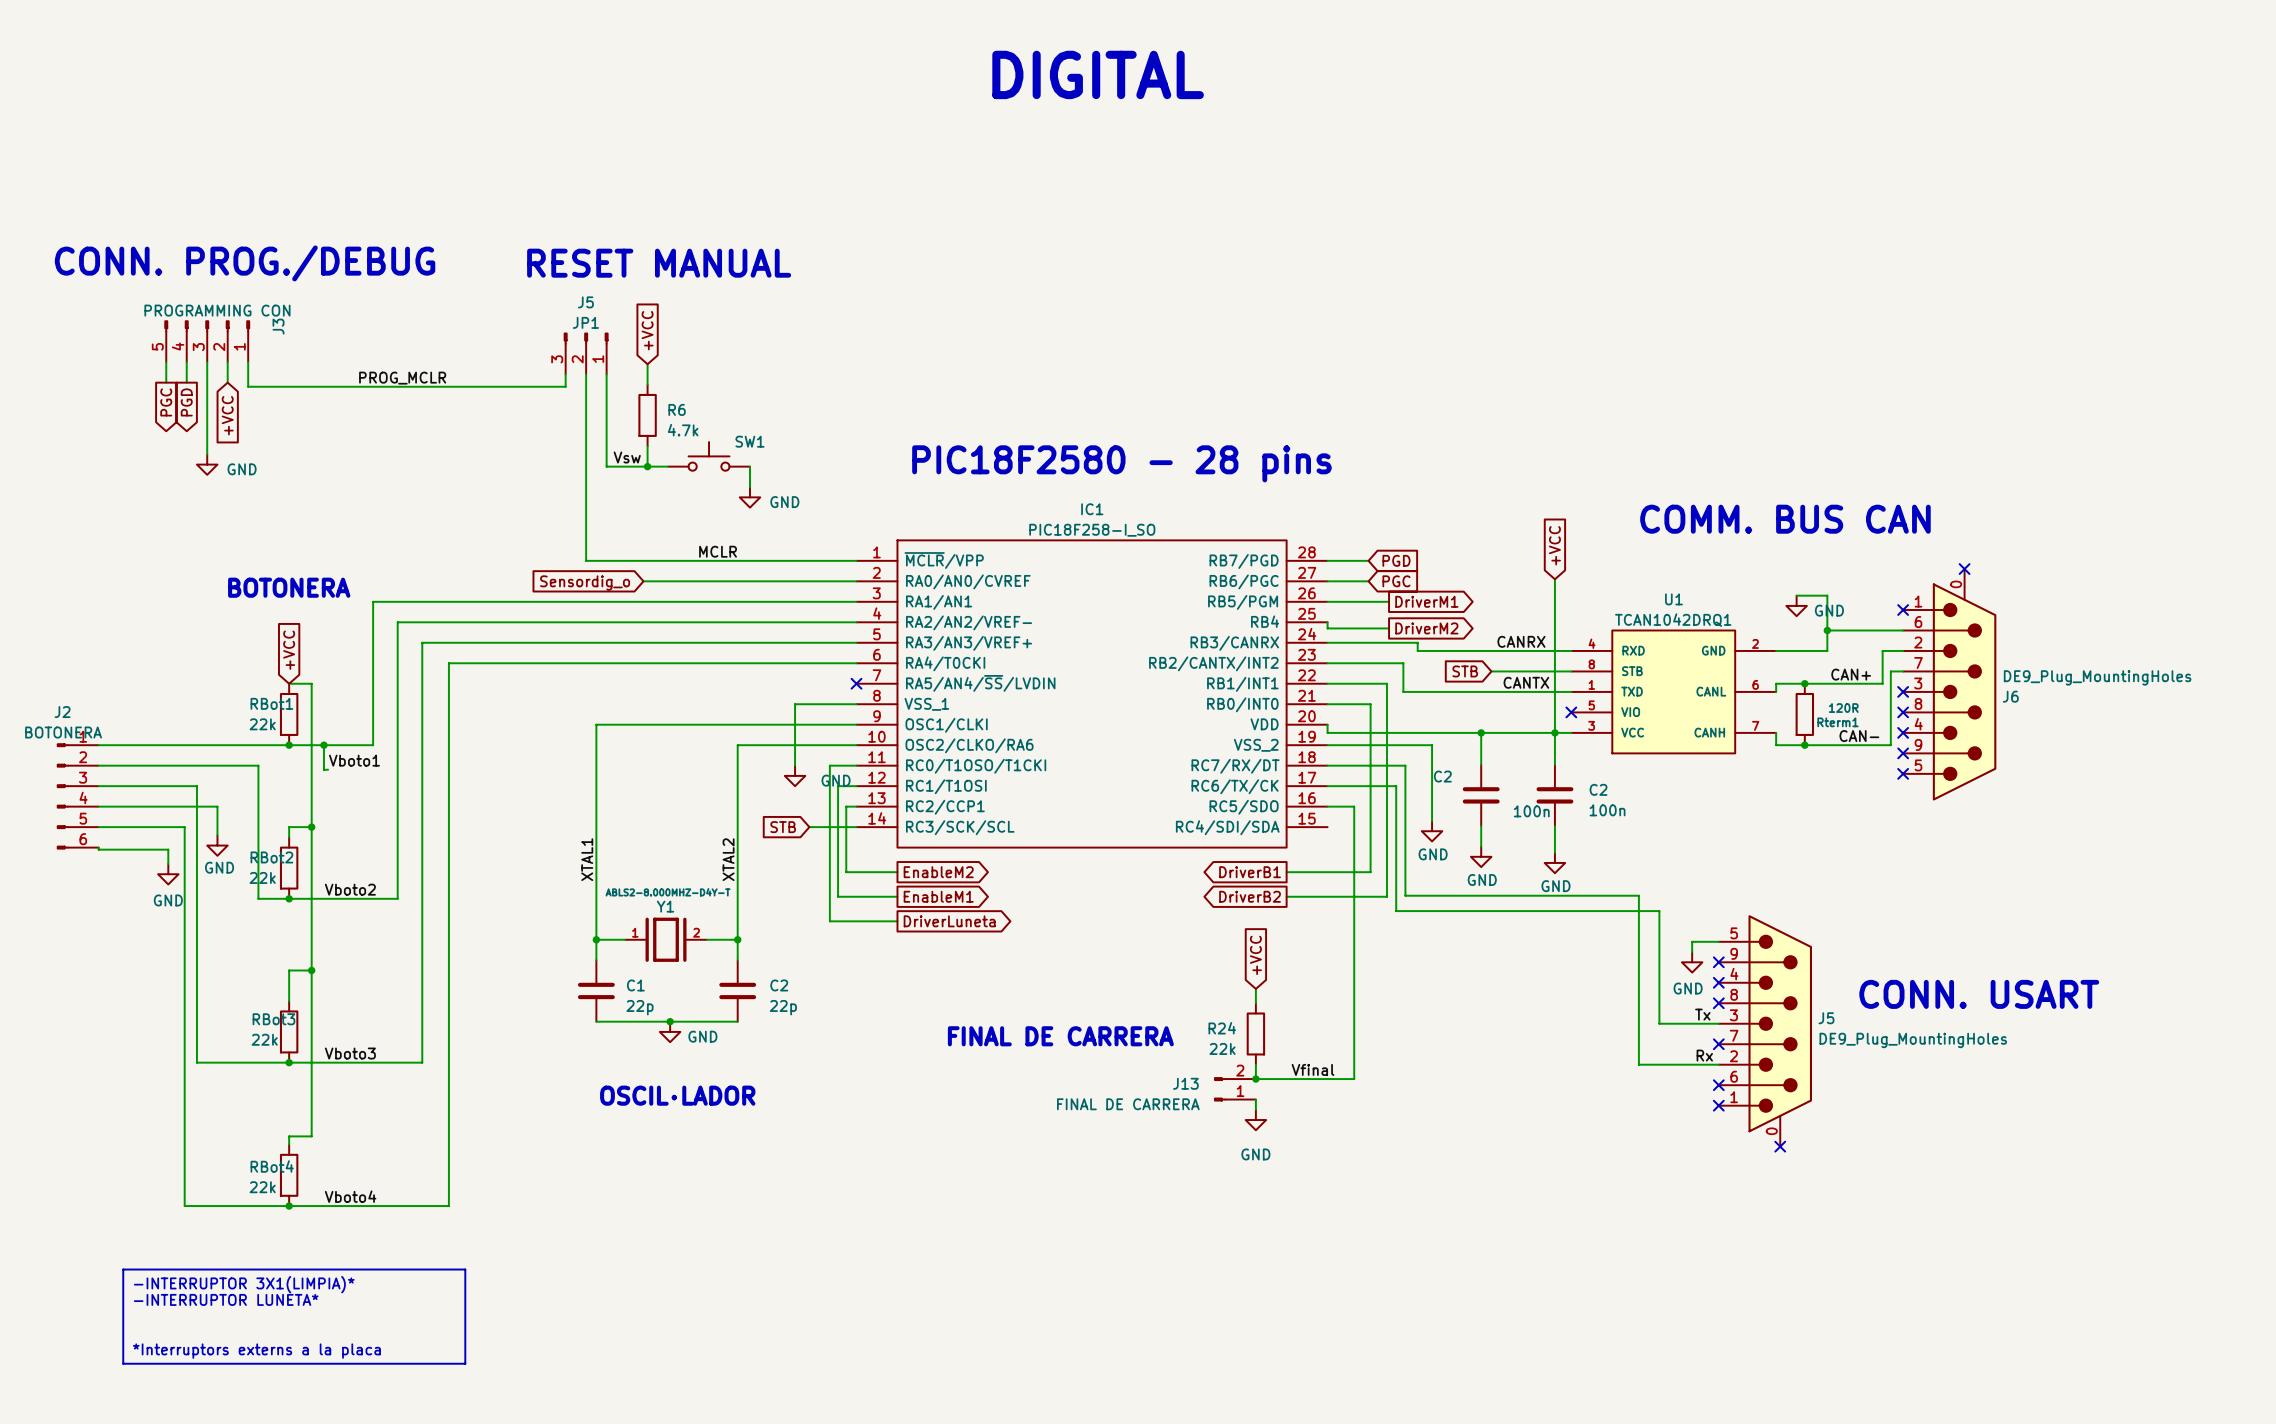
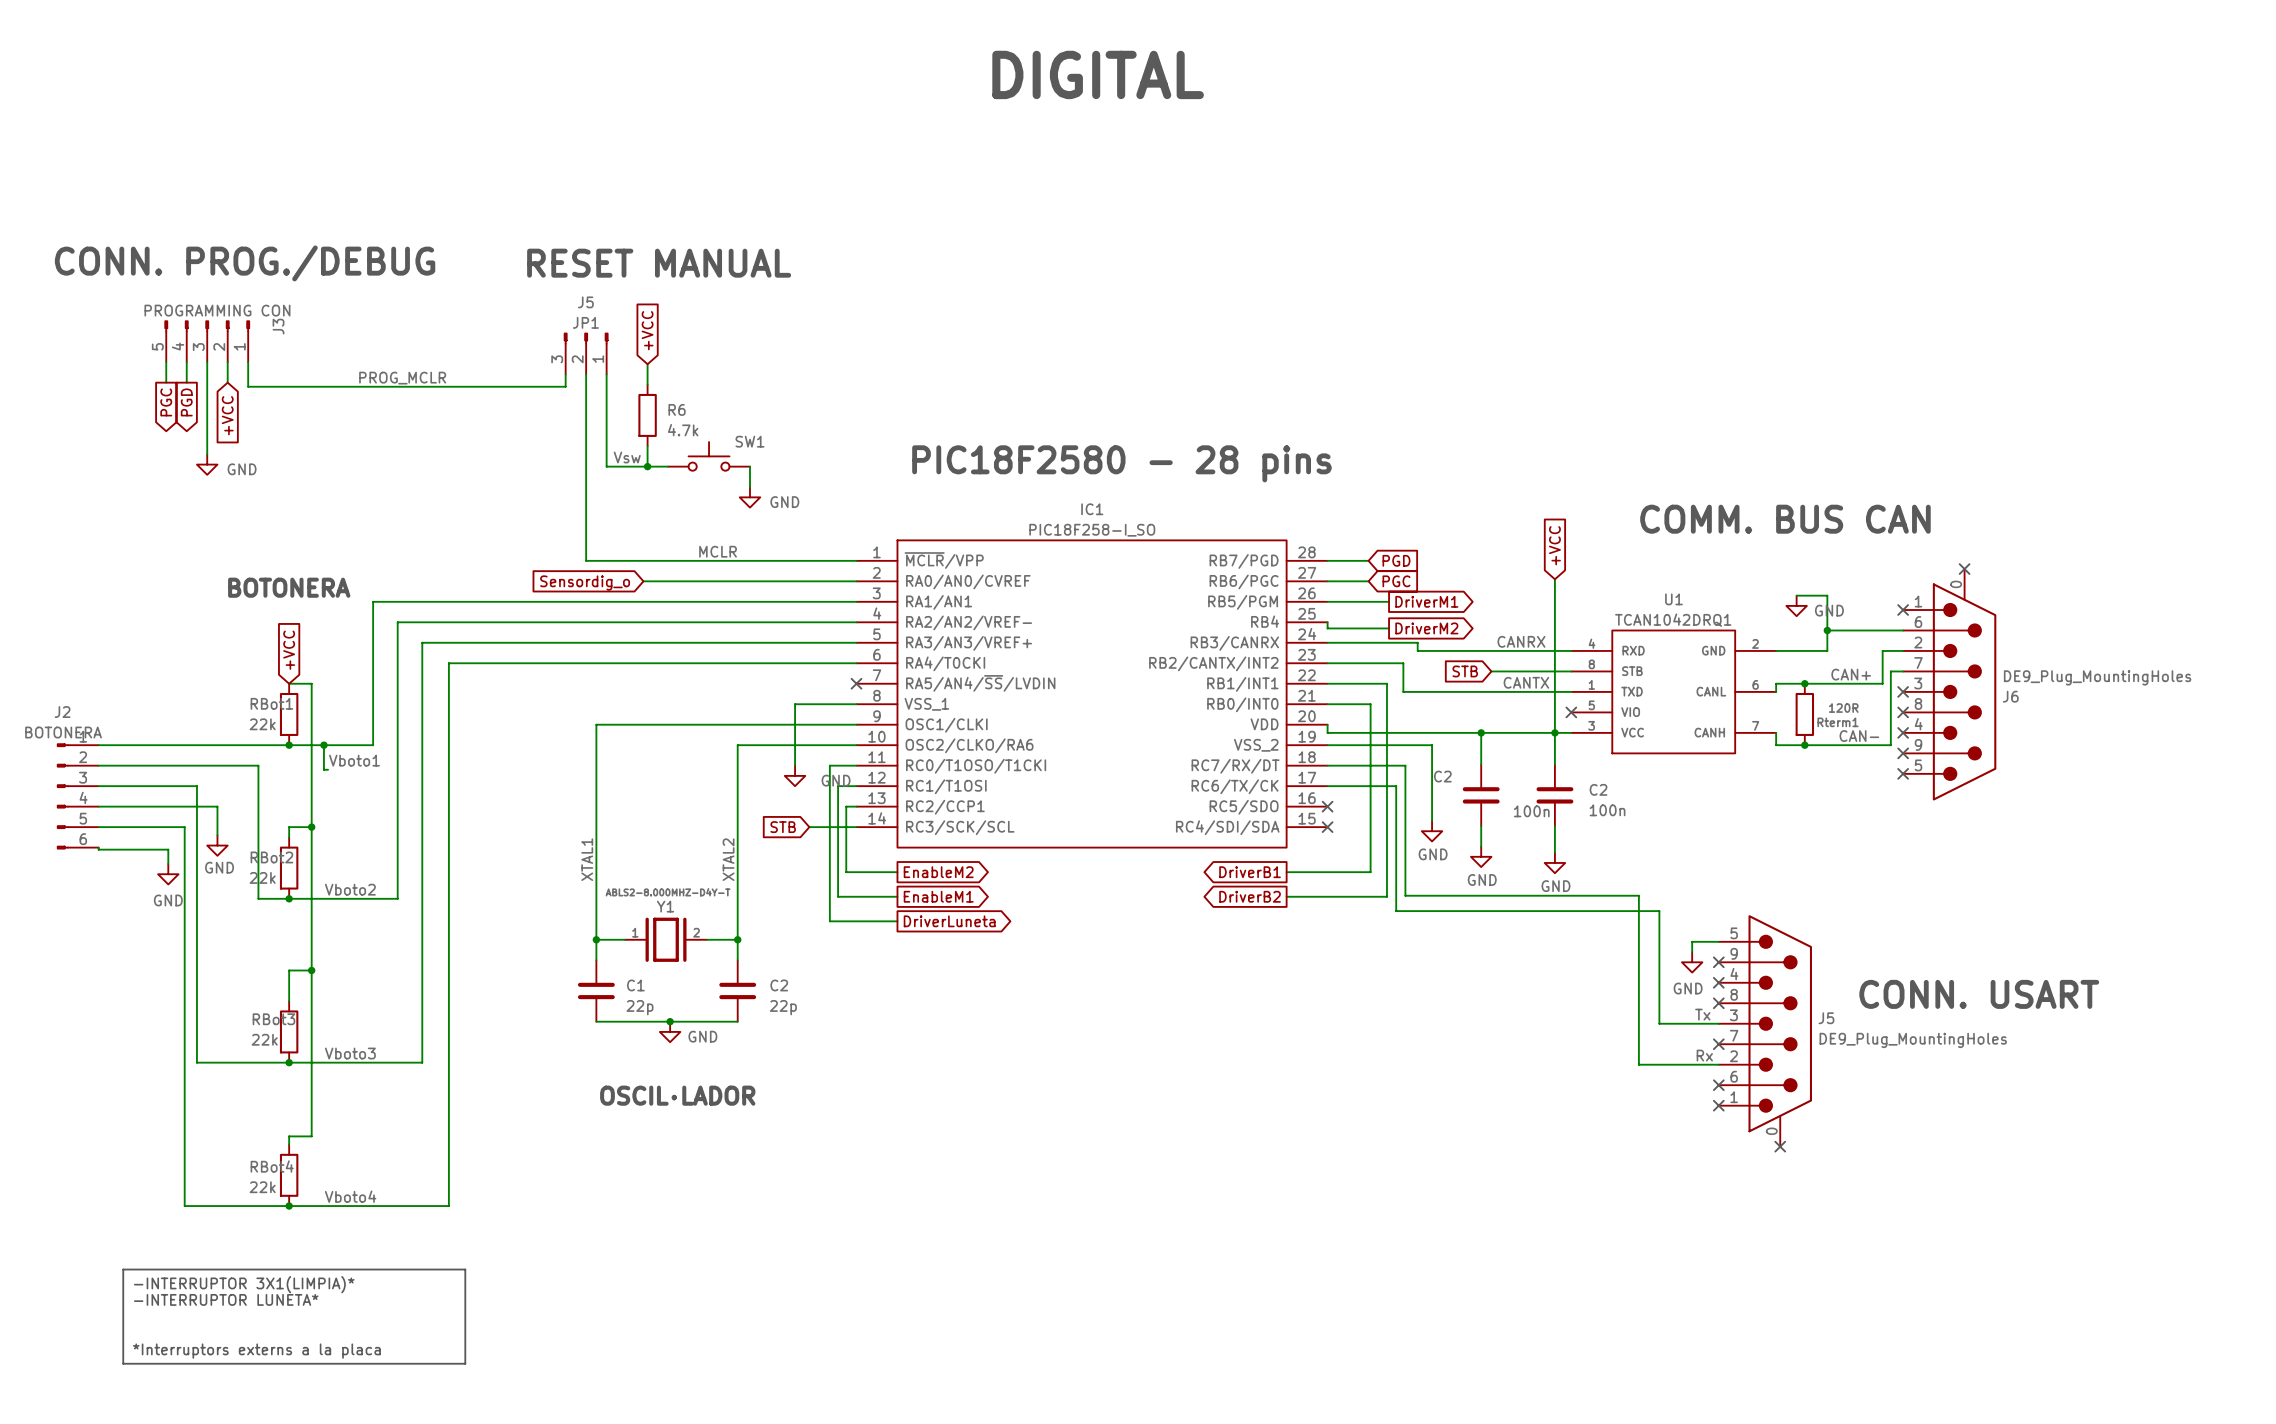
wire: (1327, 806) (1354, 806) (1354, 1079) (1255, 1079) (1255, 1064) -> none
no-connect mark: none -> (1327, 806)
no-connect mark: none -> (1327, 827)
global label: +VCC (1255, 955) -> none
wire: (1255, 988) (1255, 1003) -> none
R24: 22k (1255, 1033) -> none
text: FINAL DE CARRERA (1060, 1036) -> none
label: Vfinal (1313, 1069) -> none
junction: (1255, 1079) -> none
J13: FINAL DE CARRERA (1235, 1089) -> none
wire: (1255, 1099) (1255, 1109) -> none
power symbol: GND (1255, 1120) -> none

